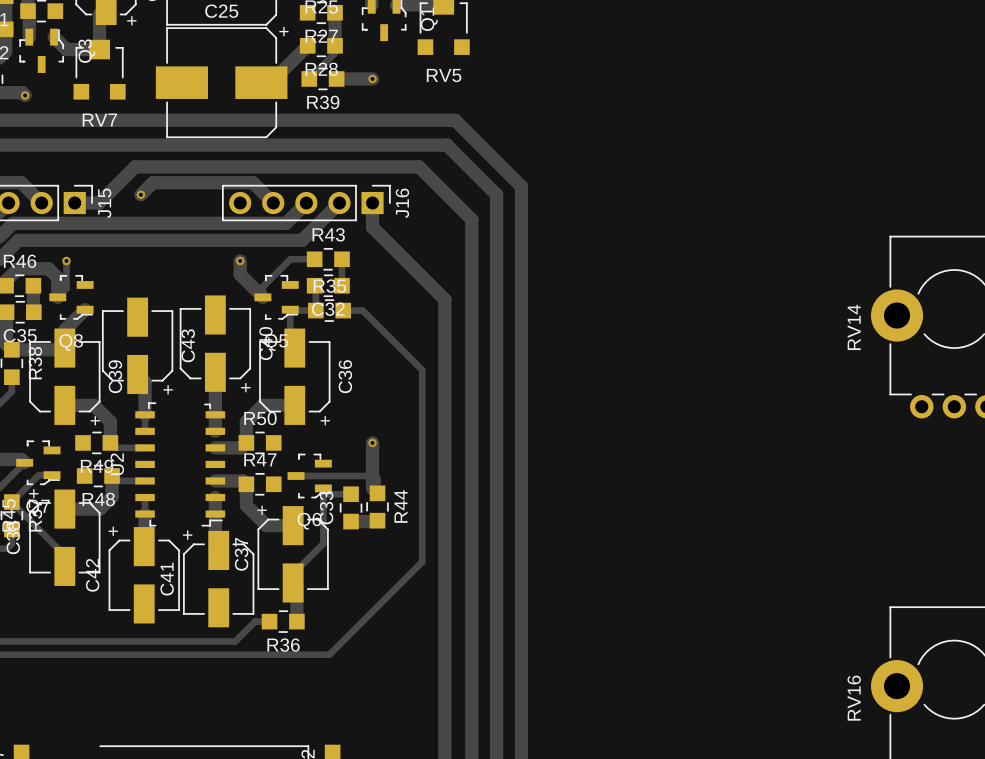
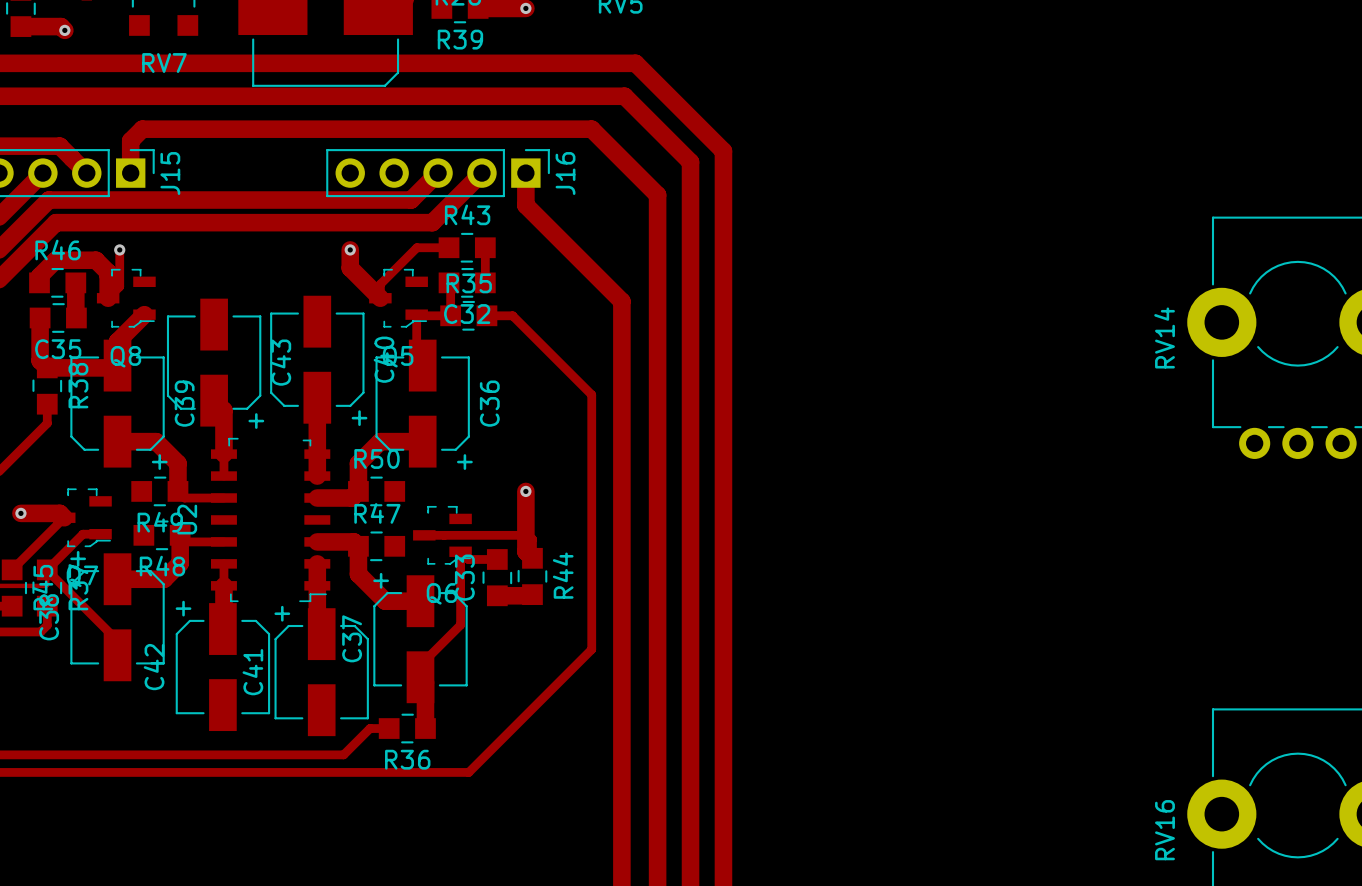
track: (422, 169) (419, 166) (135, 166) (99, 203) (74, 203) -> (591, 129) (142, 129) (130, 140) (130, 173)
track: (140, 194) (152, 182) (252, 182) (273, 203) -> none
via: (140, 194) -> none

